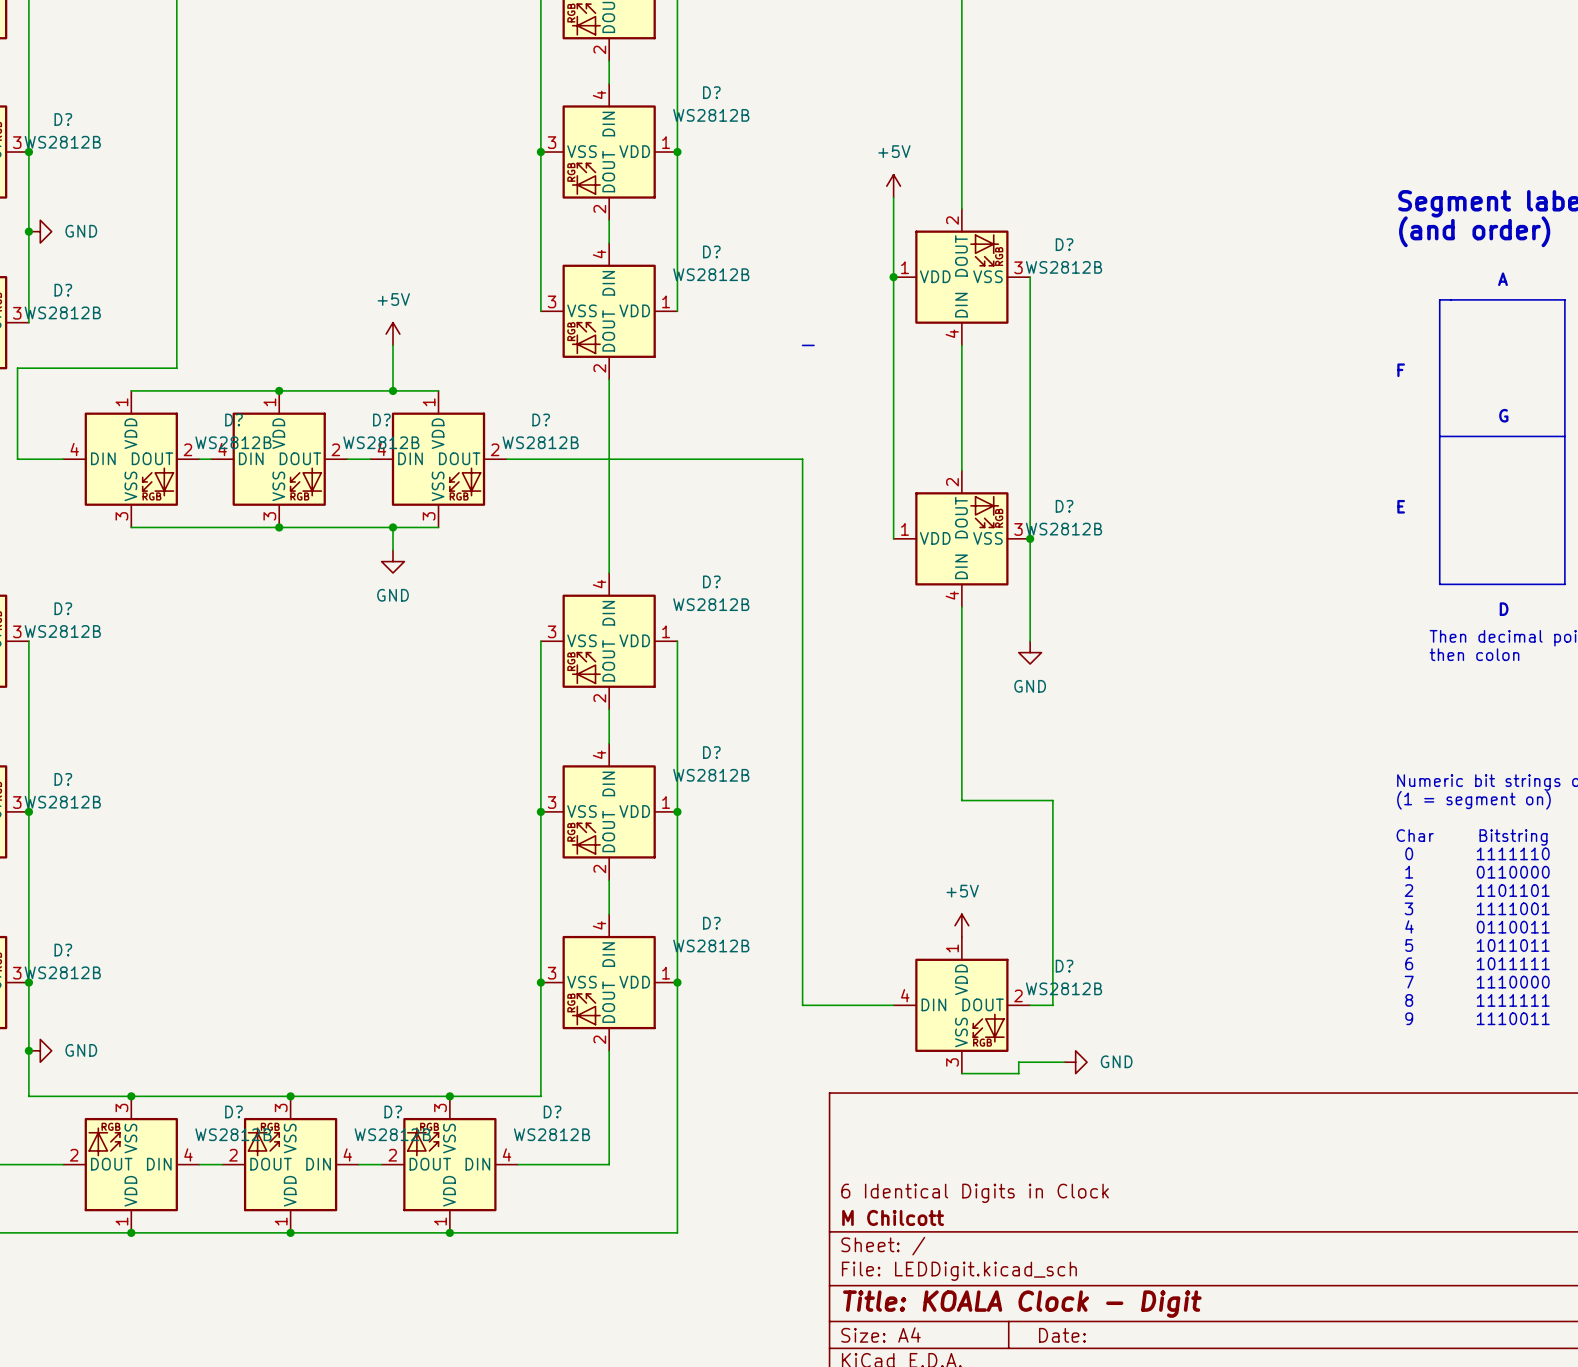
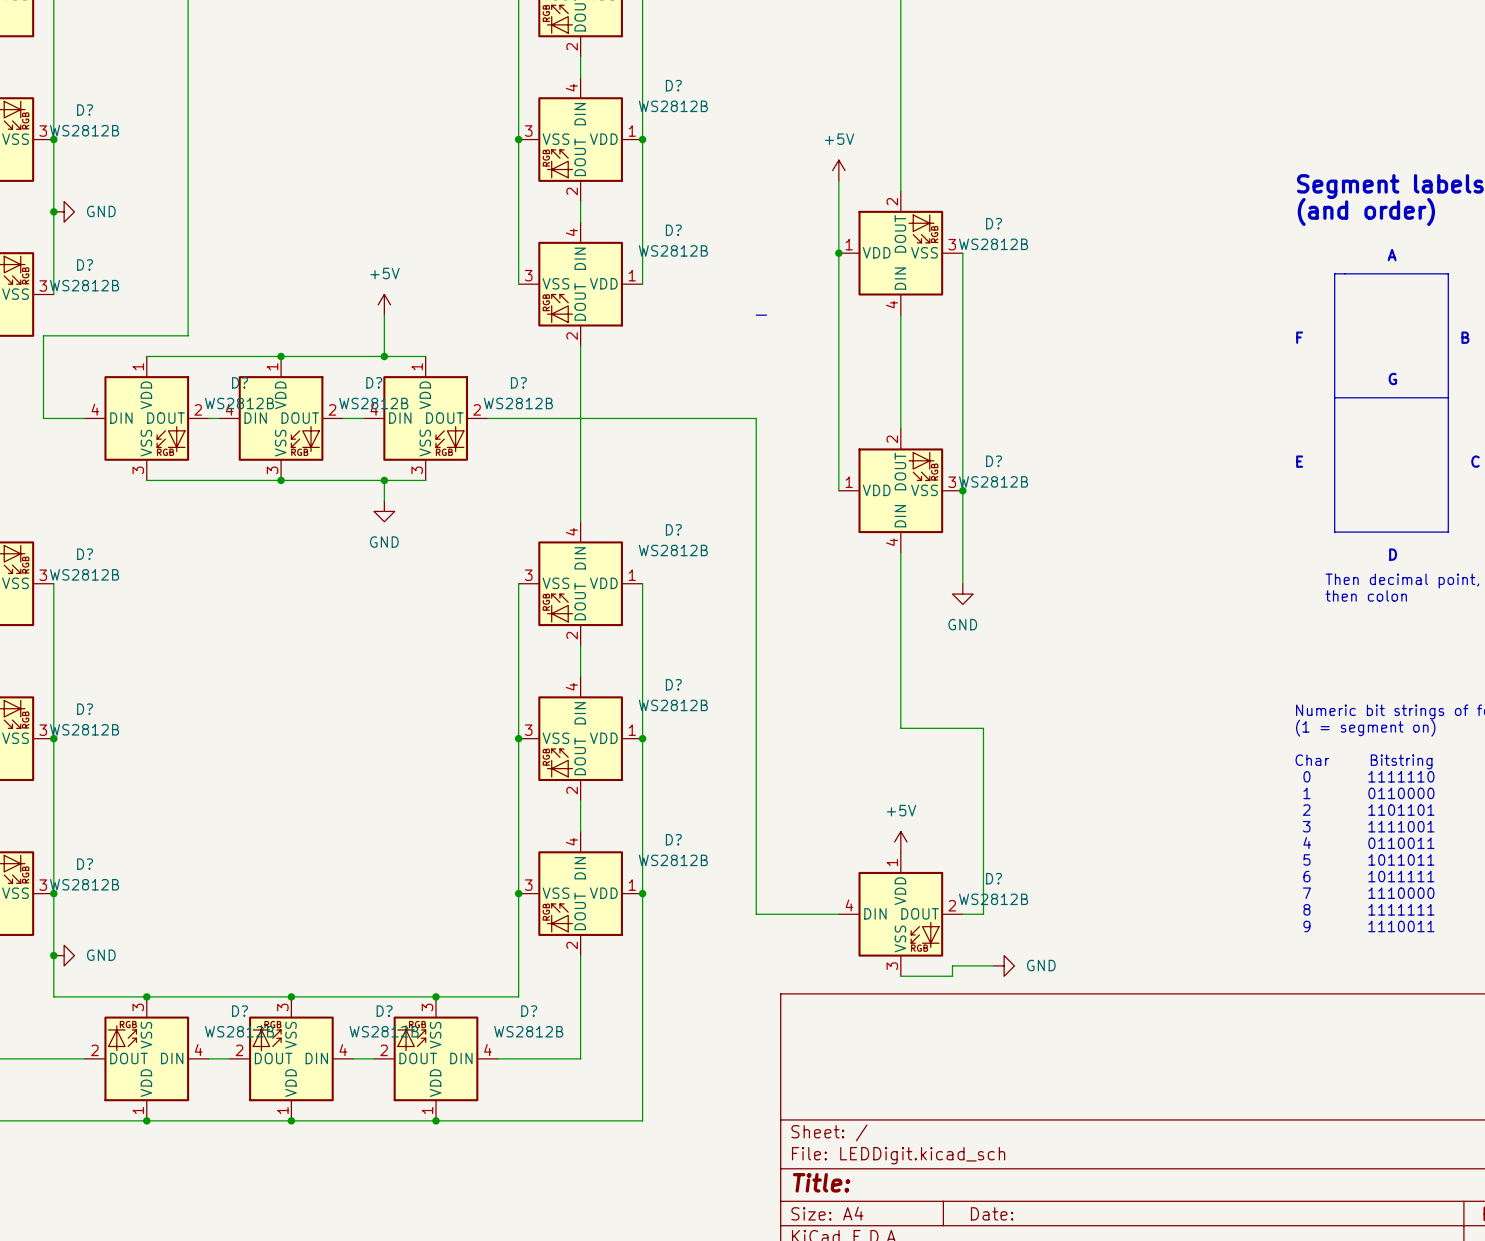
title block: 6 Identical Digits in Clock (975, 1193) -> none
title block: M Chilcott (893, 1217) -> none
title block: Title: KOALA Clock - Digit (1022, 1304) -> Title: (821, 1182)

